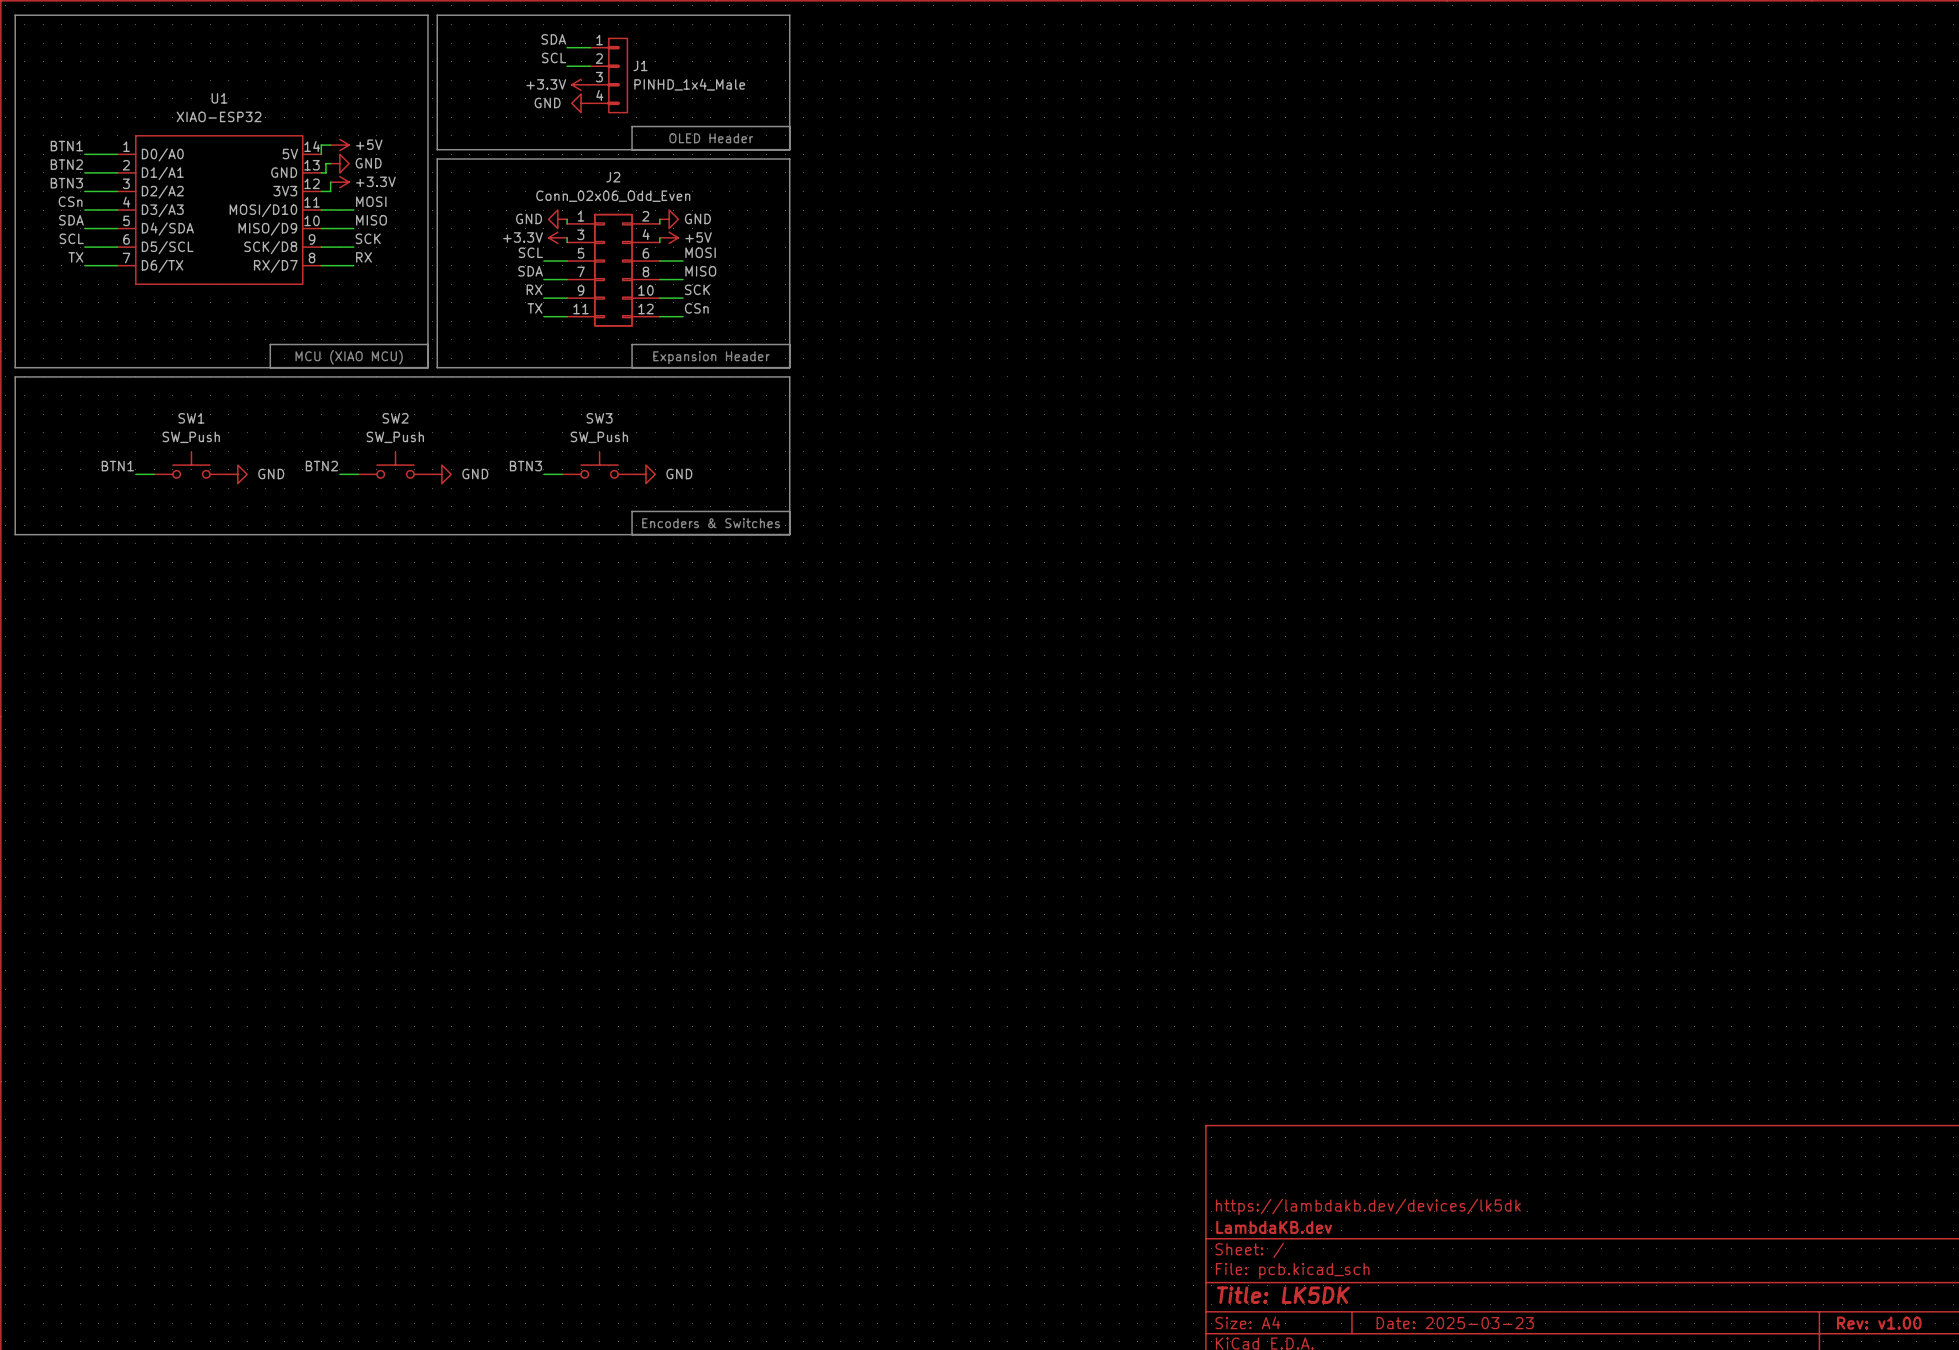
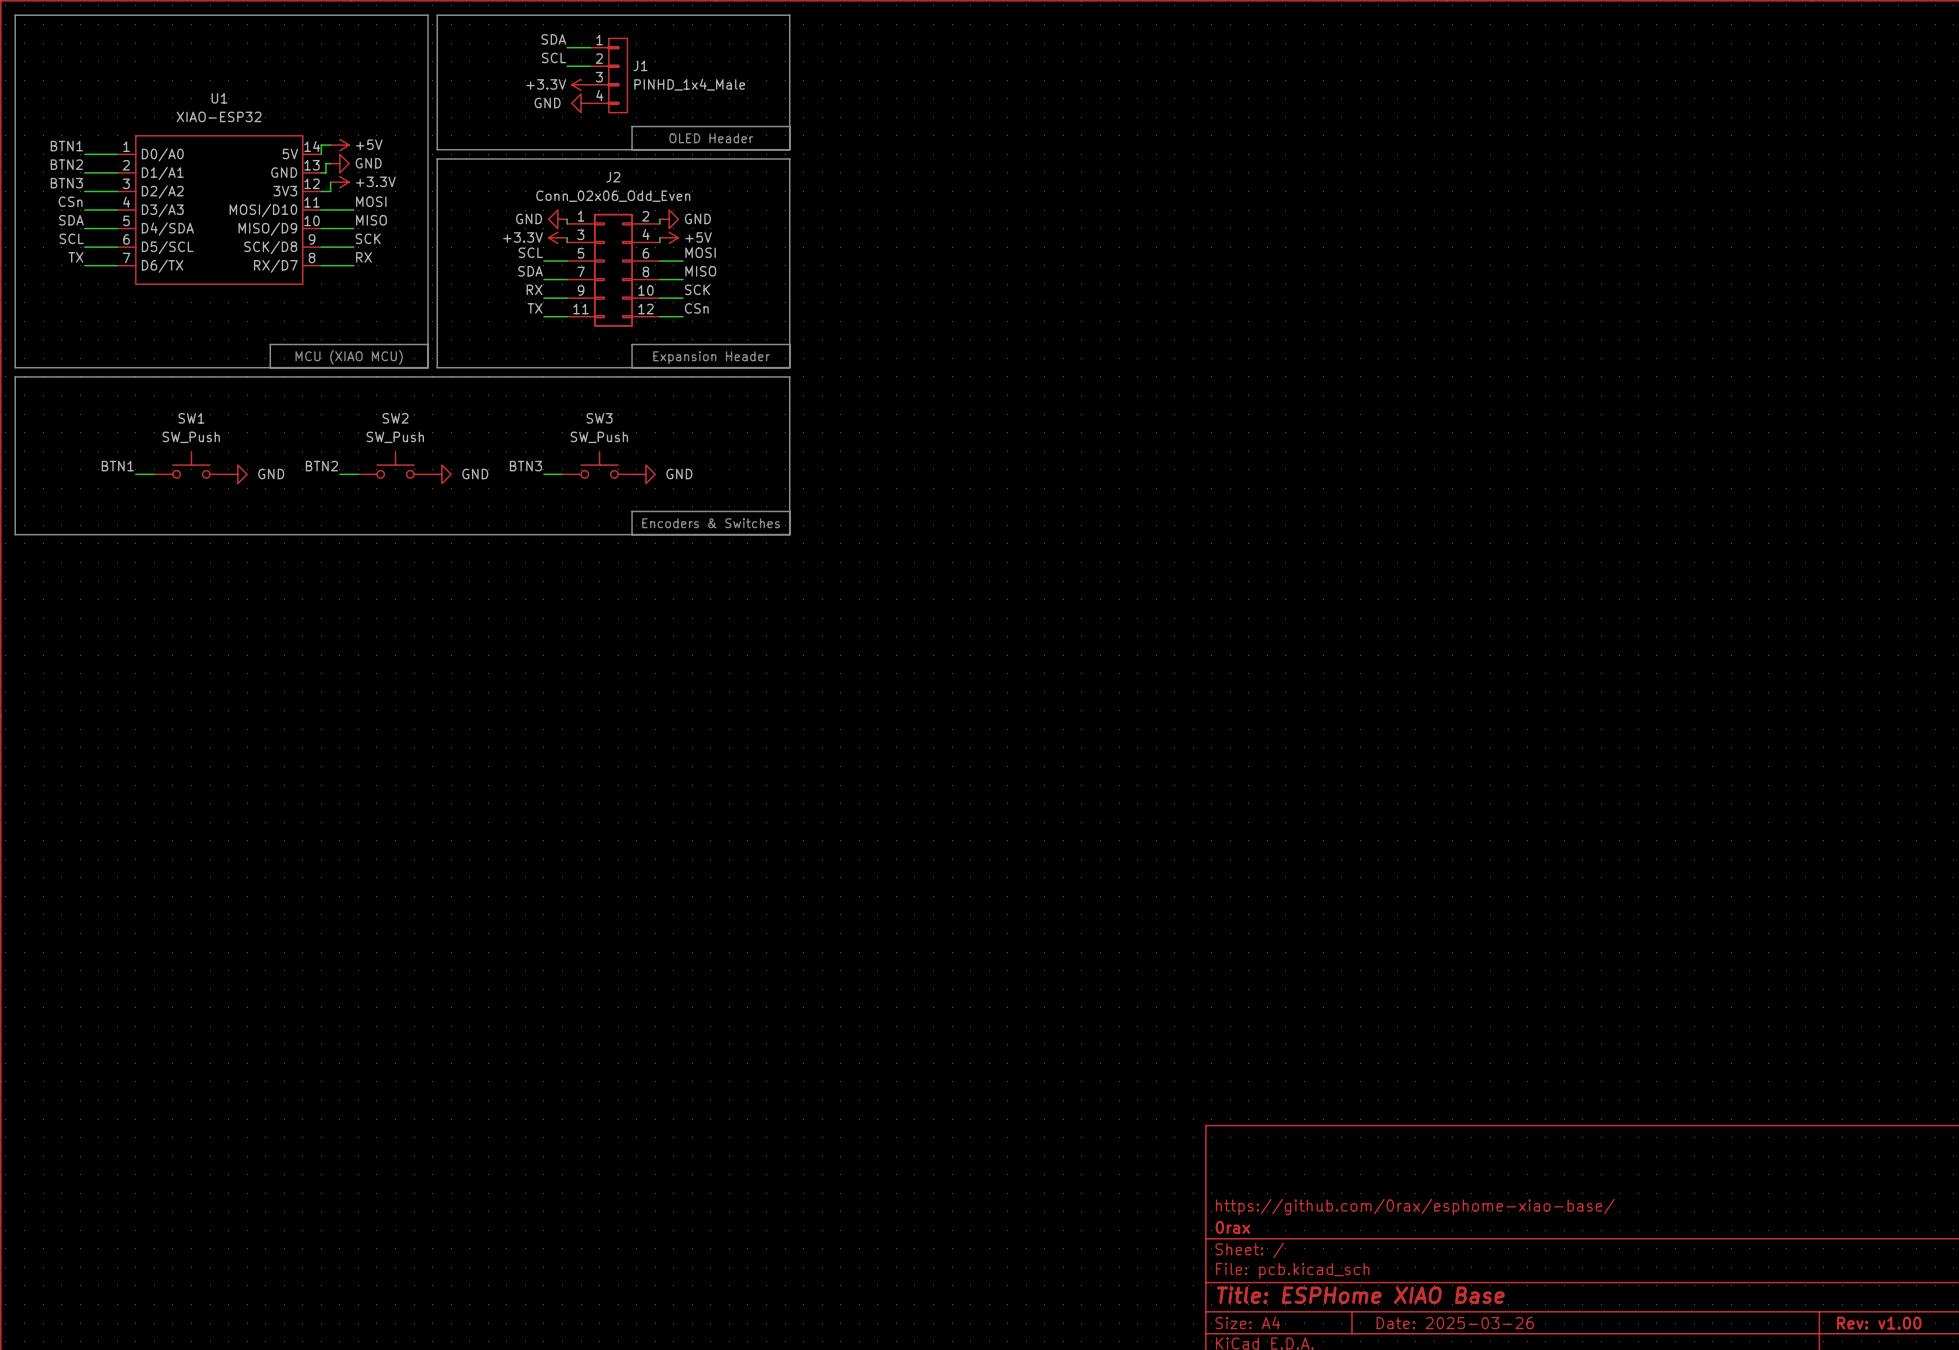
title block: https://lambdakb.dev/devices/lk5dk (1368, 1207) -> https://github.com/0rax/esphome-xiao-base/ (1415, 1207)
title block: LambdaKB.dev (1274, 1227) -> 0rax (1232, 1227)
title block: Title: LK5DK (1283, 1295) -> Title: ESPHome XIAO Base (1360, 1295)
title block: Date: 2025-03-23 (1455, 1323) -> Date: 2025-03-26 (1455, 1323)

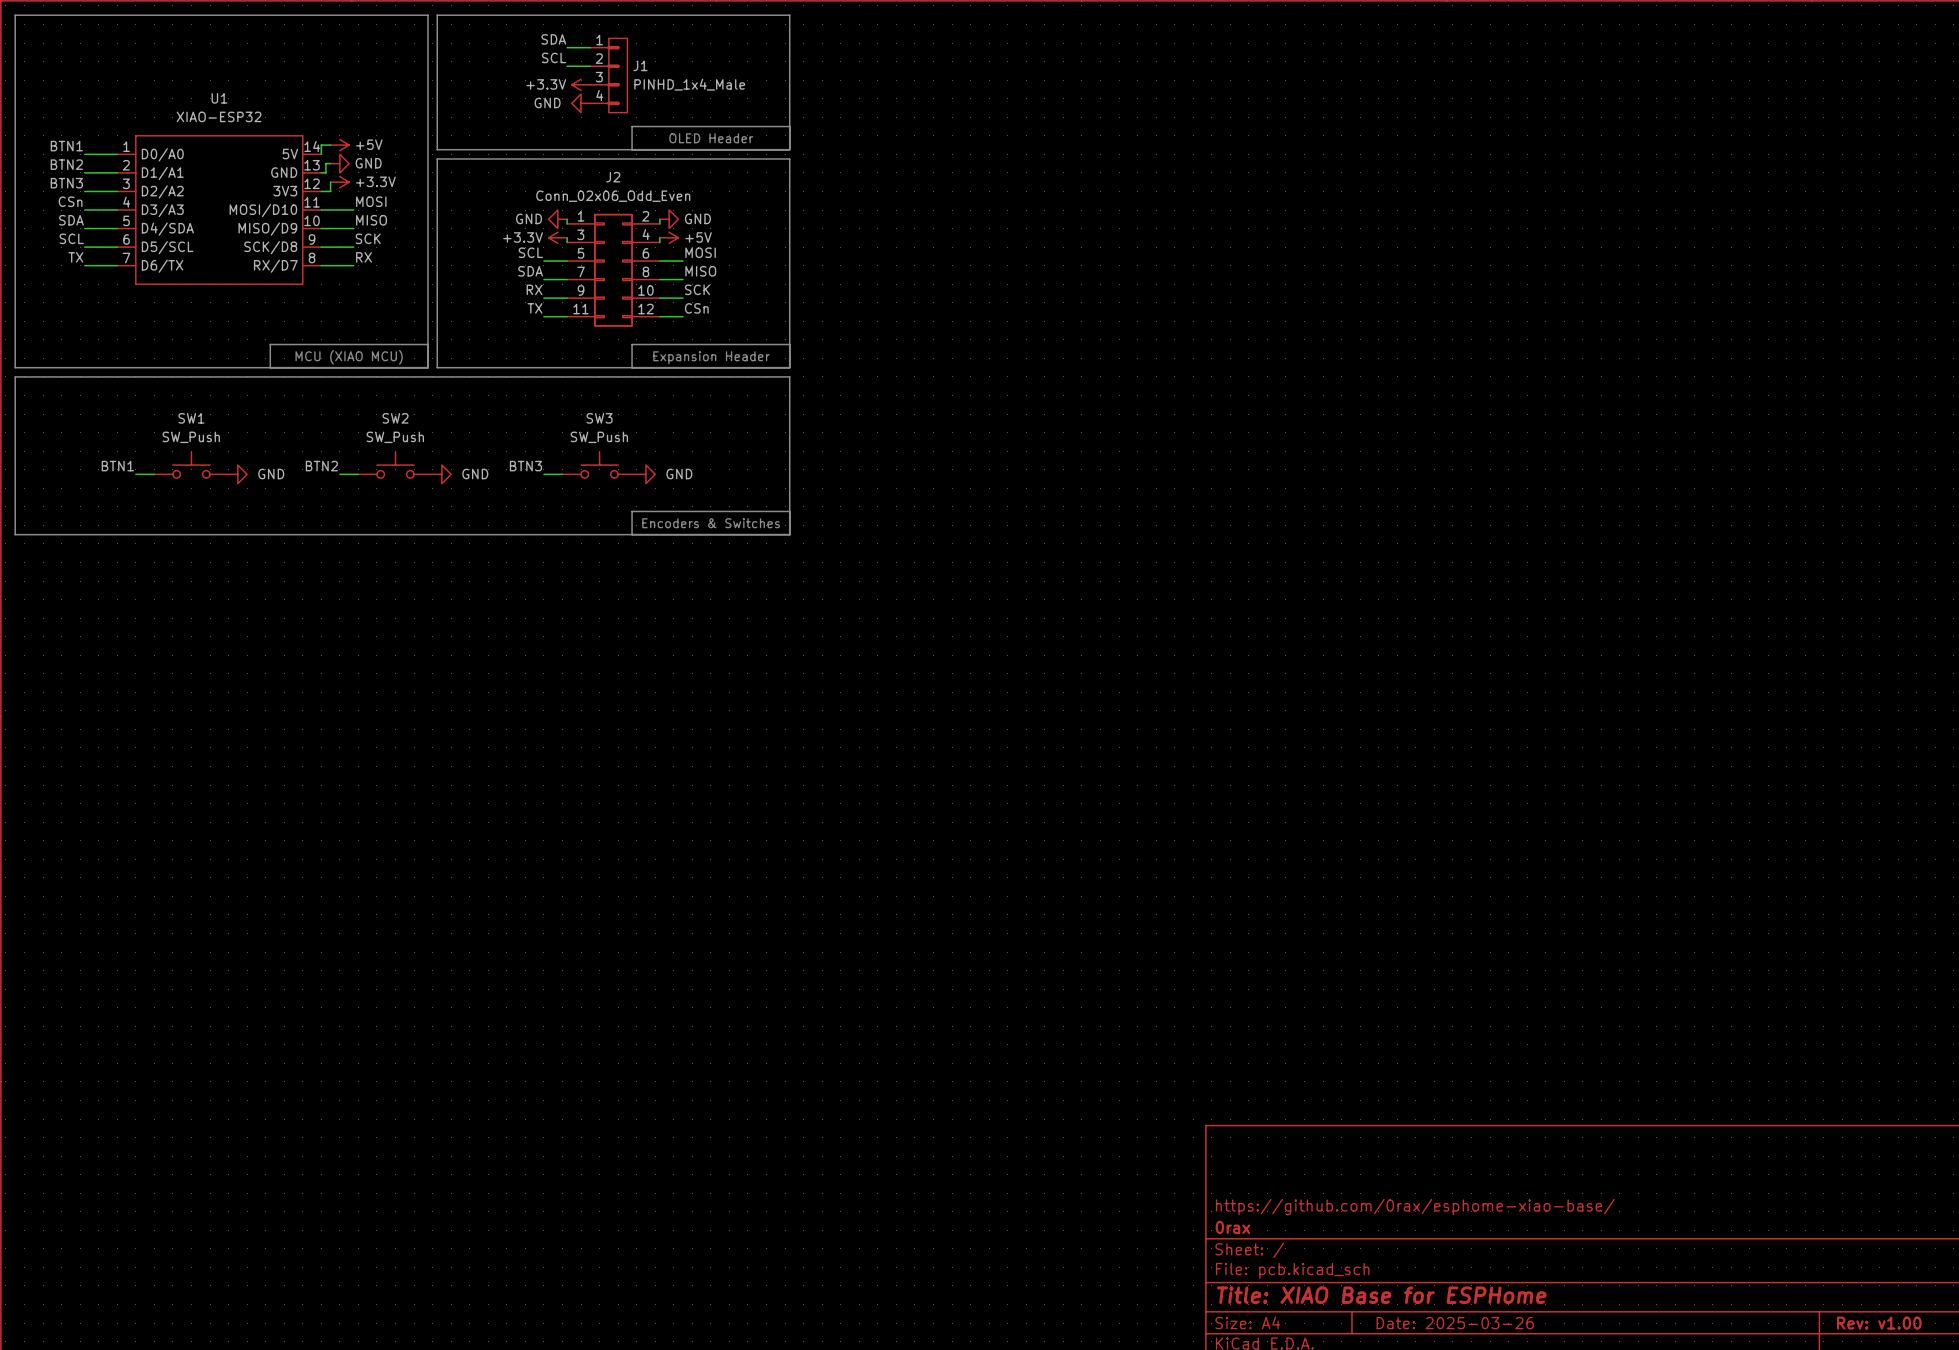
title block: Title: ESPHome XIAO Base (1360, 1295) -> Title: XIAO Base for ESPHome (1381, 1295)

